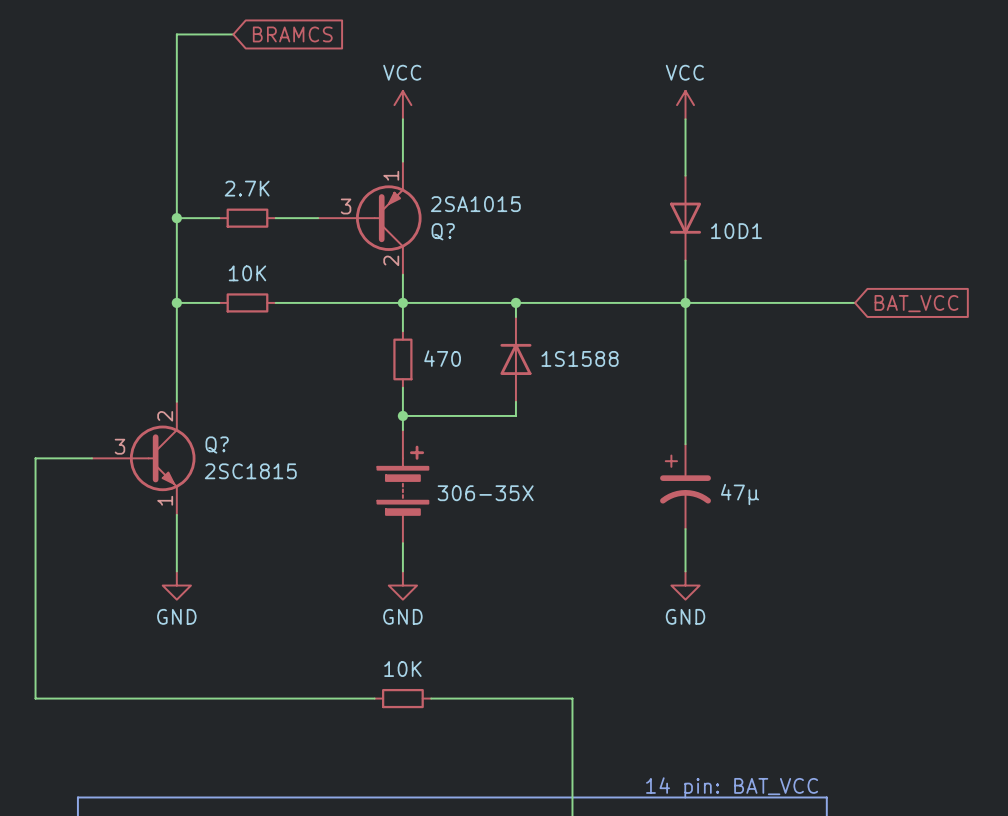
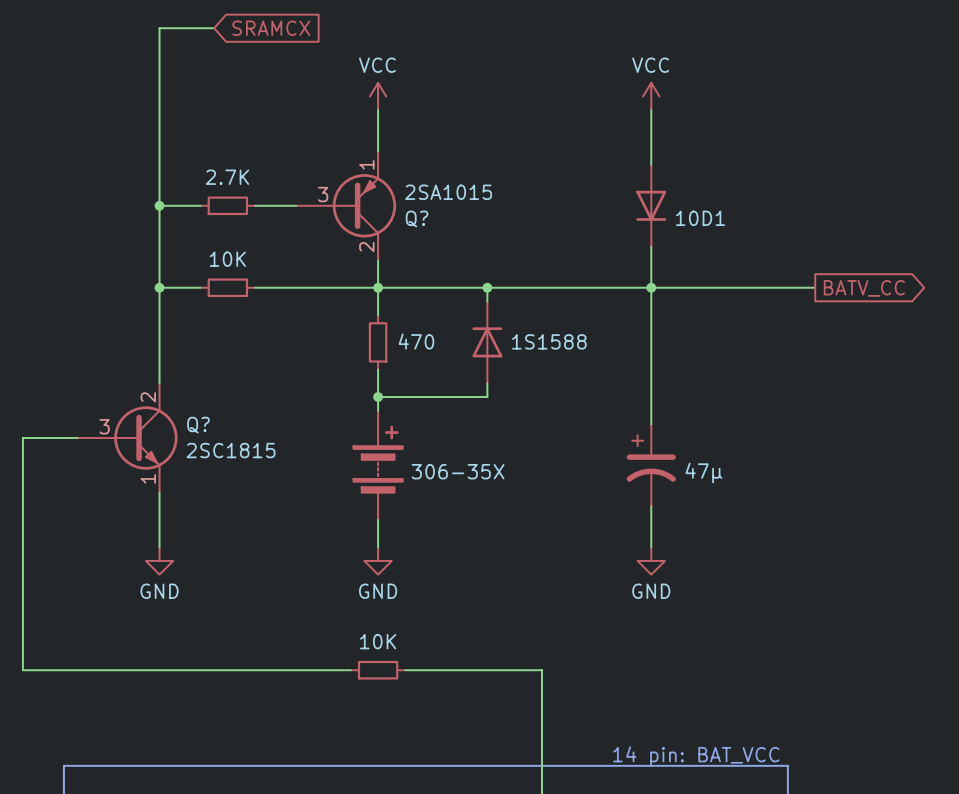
global label: BRAMCS (292, 34) -> SRAMCX (271, 28)
global label shape: input (916, 303) -> output (864, 288)
global label: BAT_VCC (916, 303) -> BATV_CC (864, 288)

